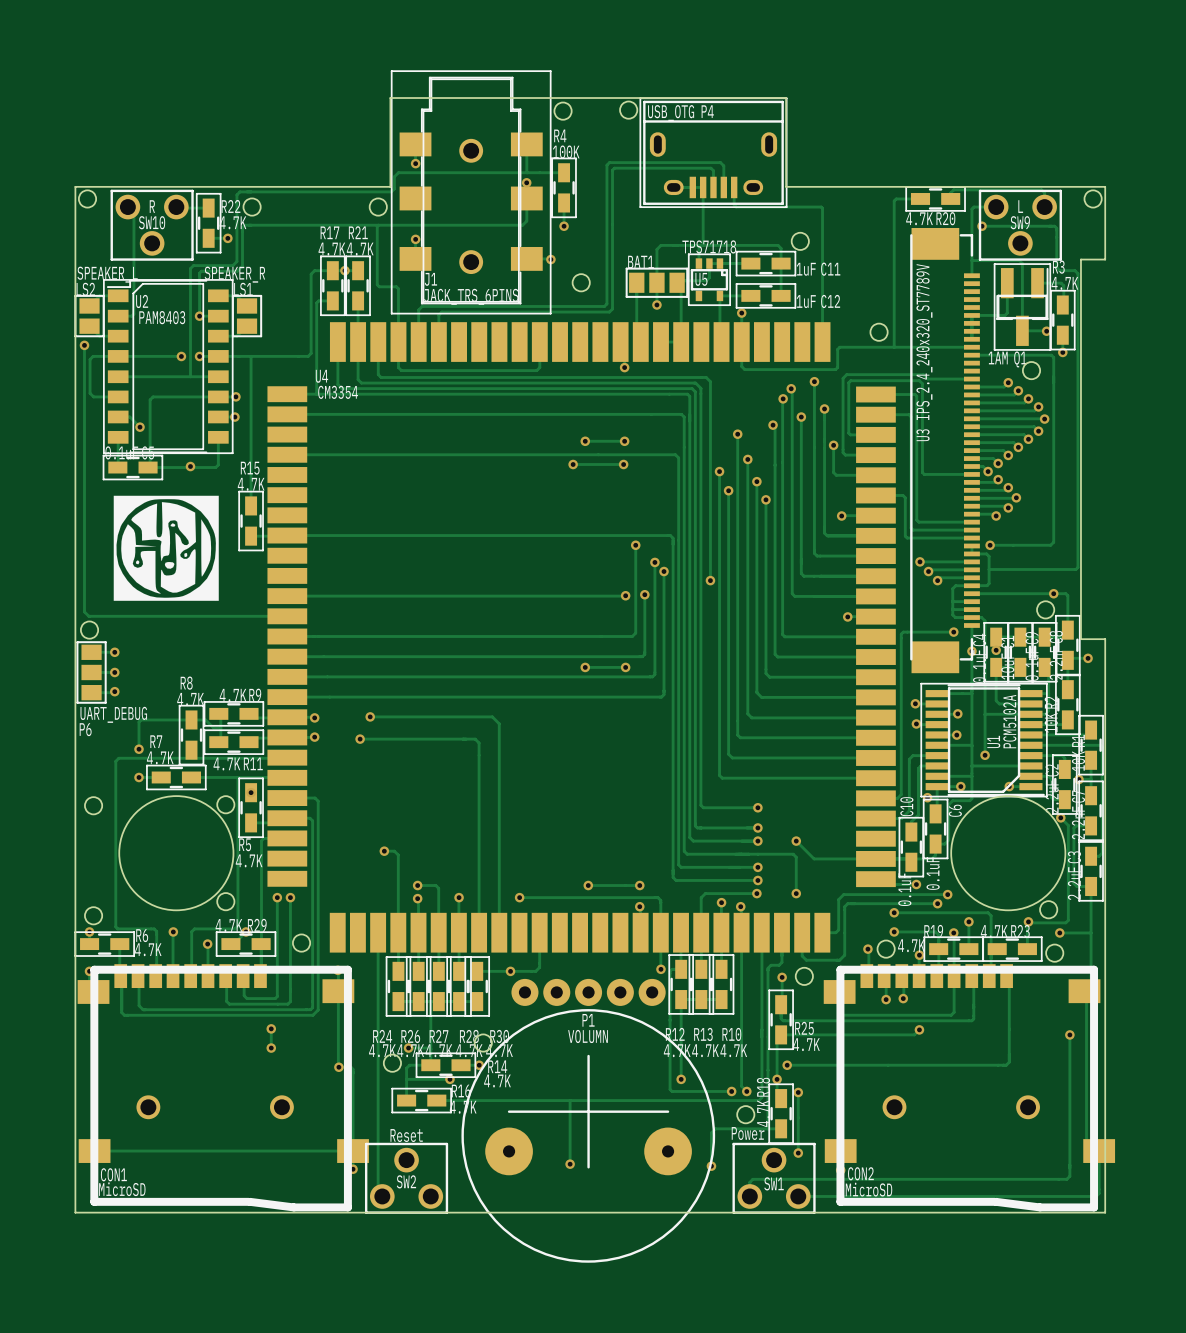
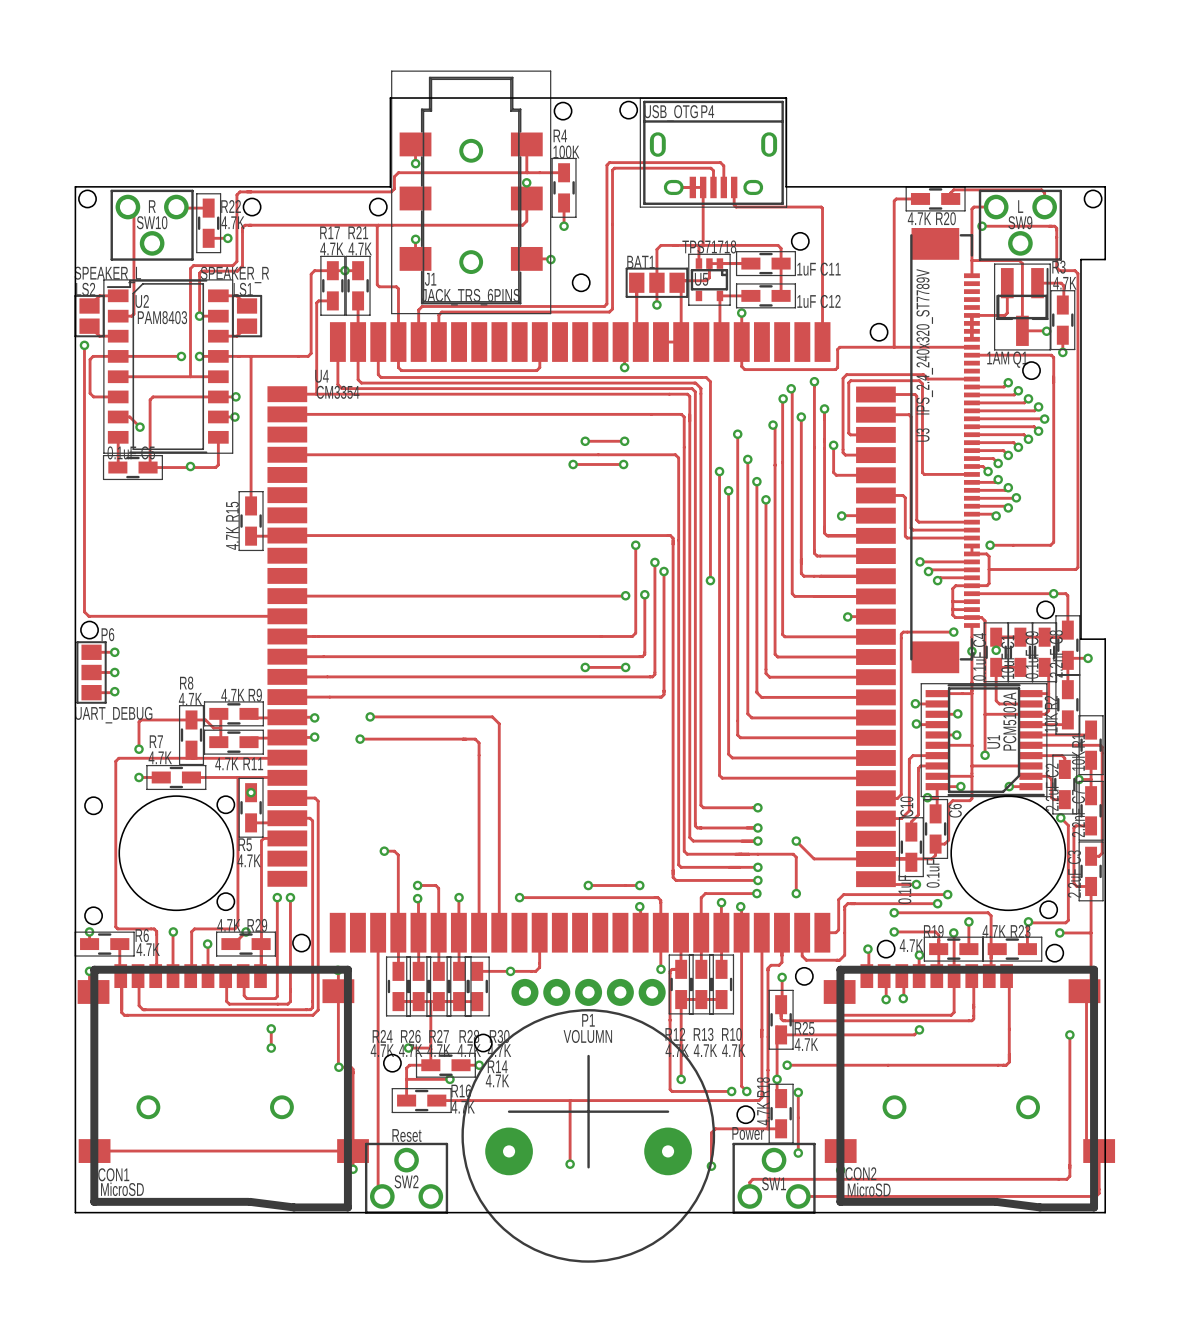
R15 name rotation: 0° (250, 468) -> 90° counterclockwise (232, 511)
R15 name position: R15 (250, 468) -> R15 (232, 511)
R15 value rotation: 0° (251, 484) -> 90° counterclockwise (232, 538)
R15 value position: 4.7K (251, 484) -> 4.7K (232, 538)
drawing: [113, 495, 219, 601] -> none
P6 name position: P6 (85, 729) -> P6 (107, 634)

